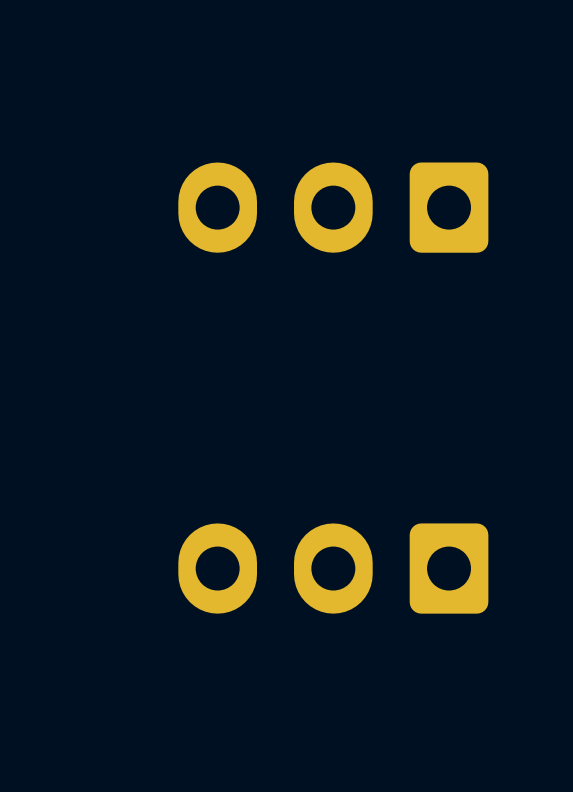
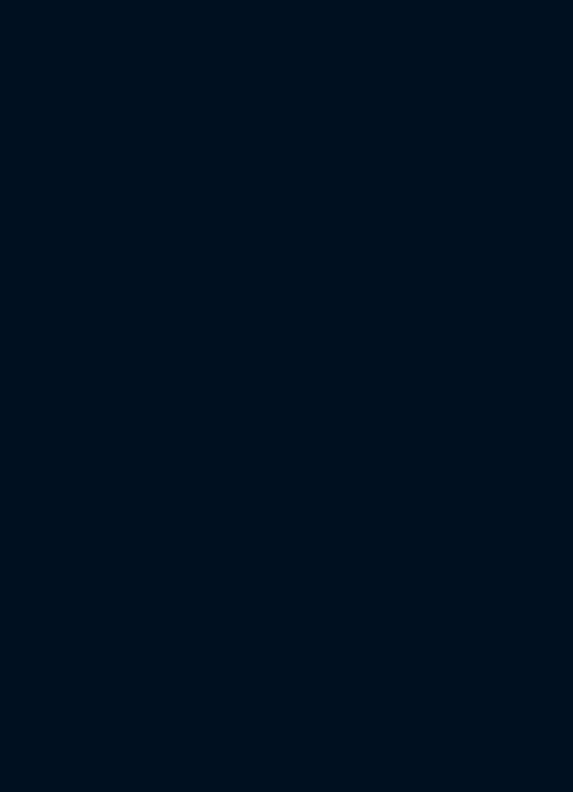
part: (333, 207) -> none
part: (333, 568) -> none

